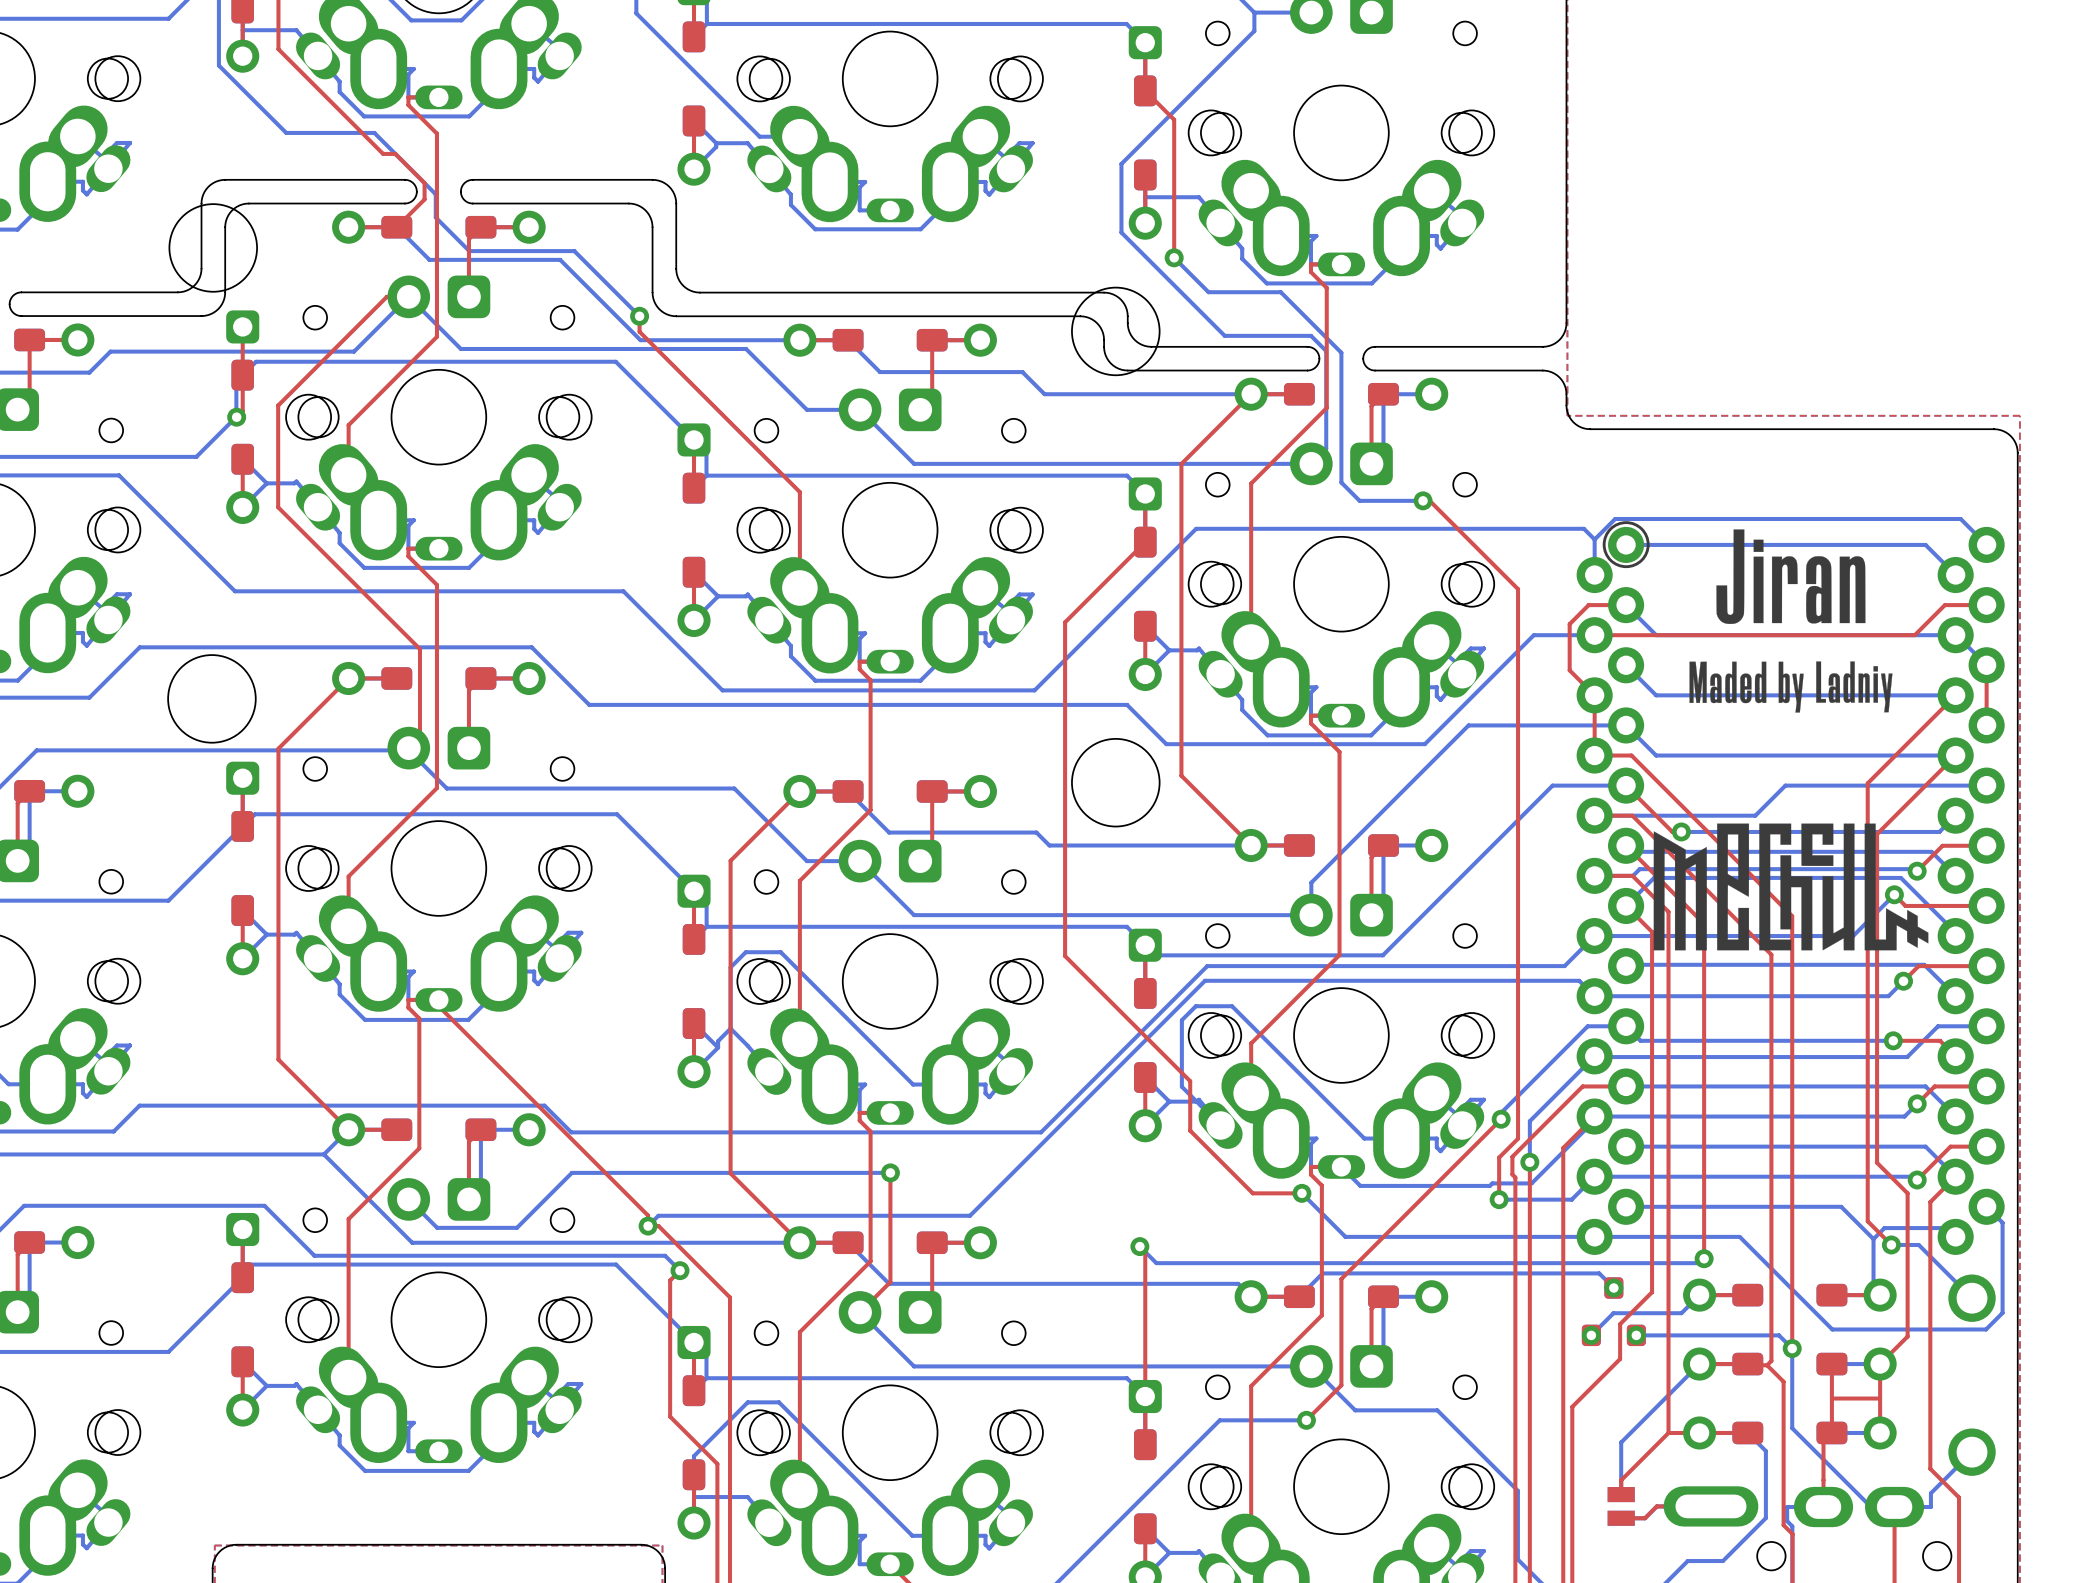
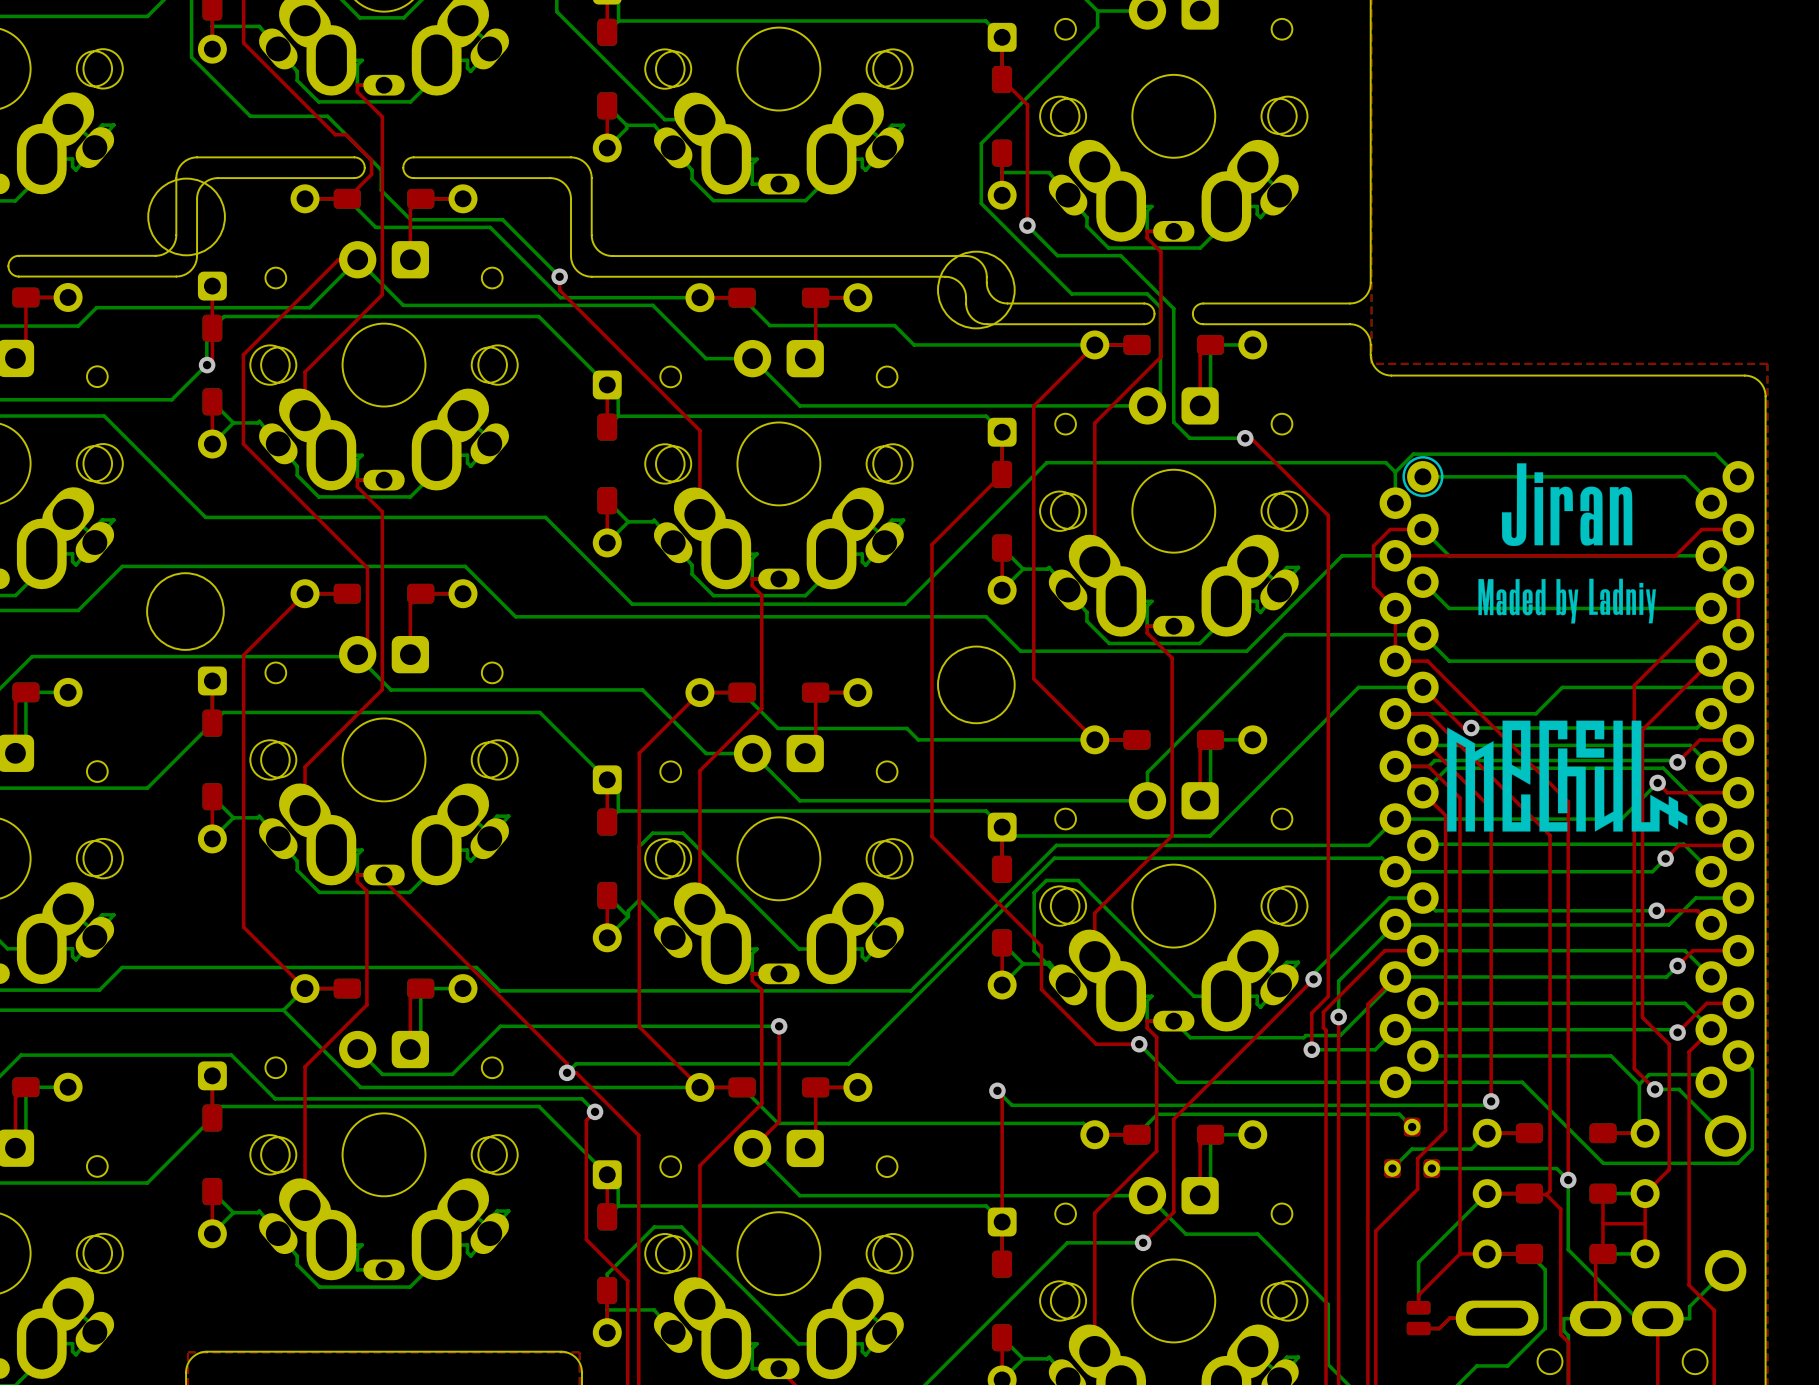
part: (1621, 1506) -> none
part: none -> (1418, 1318)

